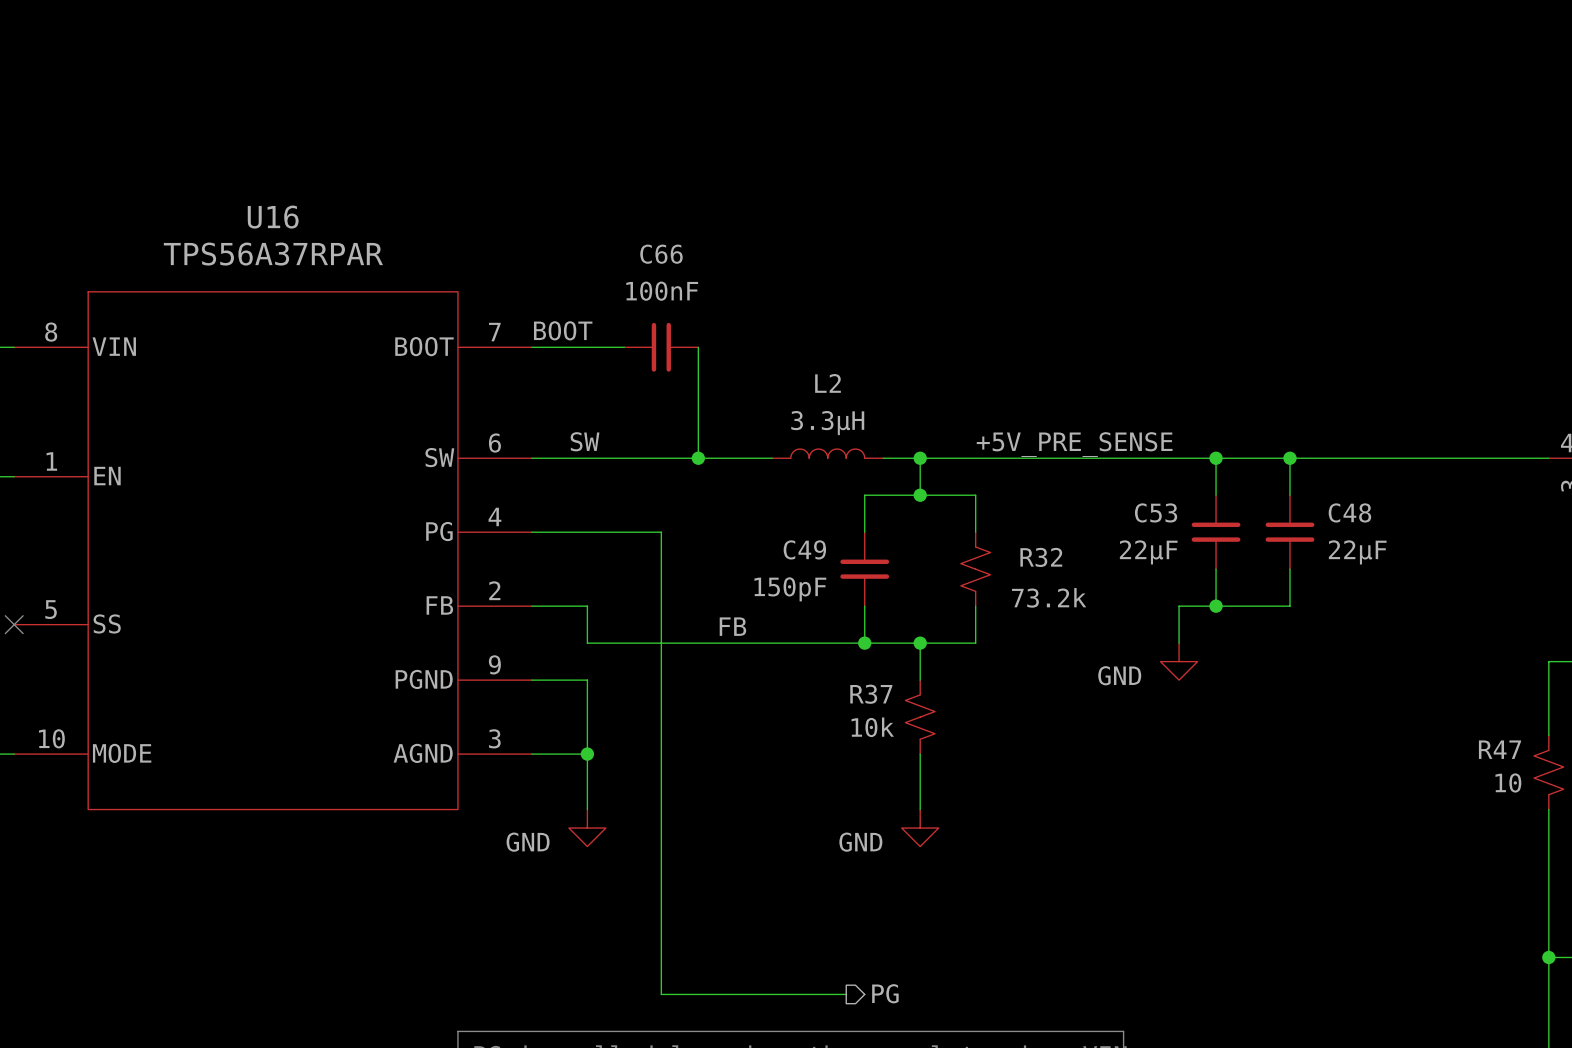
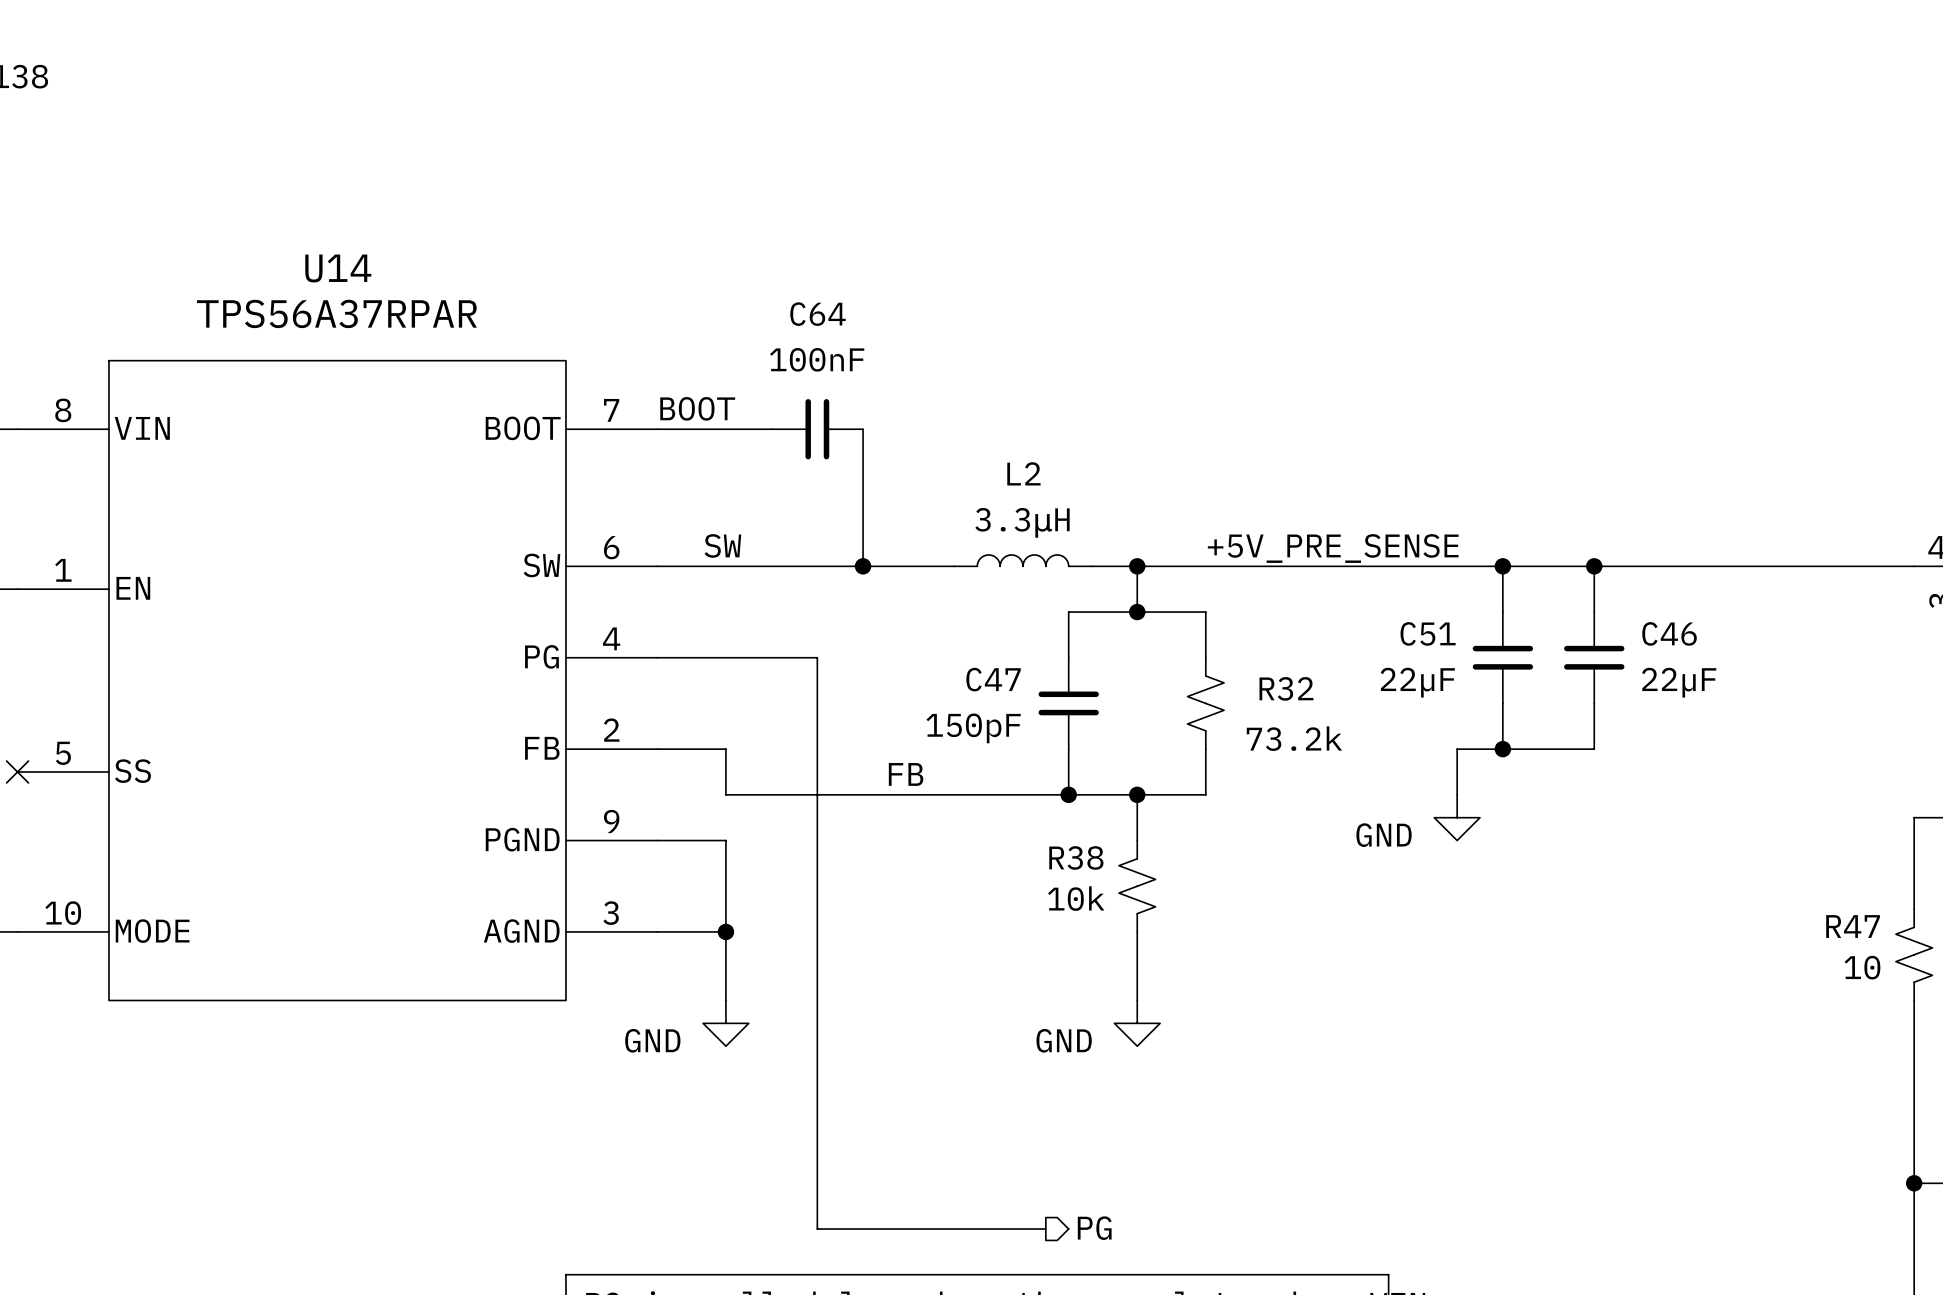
U16 name: U16 (273, 217) -> U14 (338, 268)
C66 name: C66 (661, 254) -> C64 (817, 314)
C53 name: C53 (1156, 512) -> C51 (1428, 633)
C48 name: C48 (1349, 512) -> C46 (1669, 633)
C49 name: C49 (804, 549) -> C47 (993, 679)
R37 name: R37 (871, 694) -> R38 (1076, 857)

